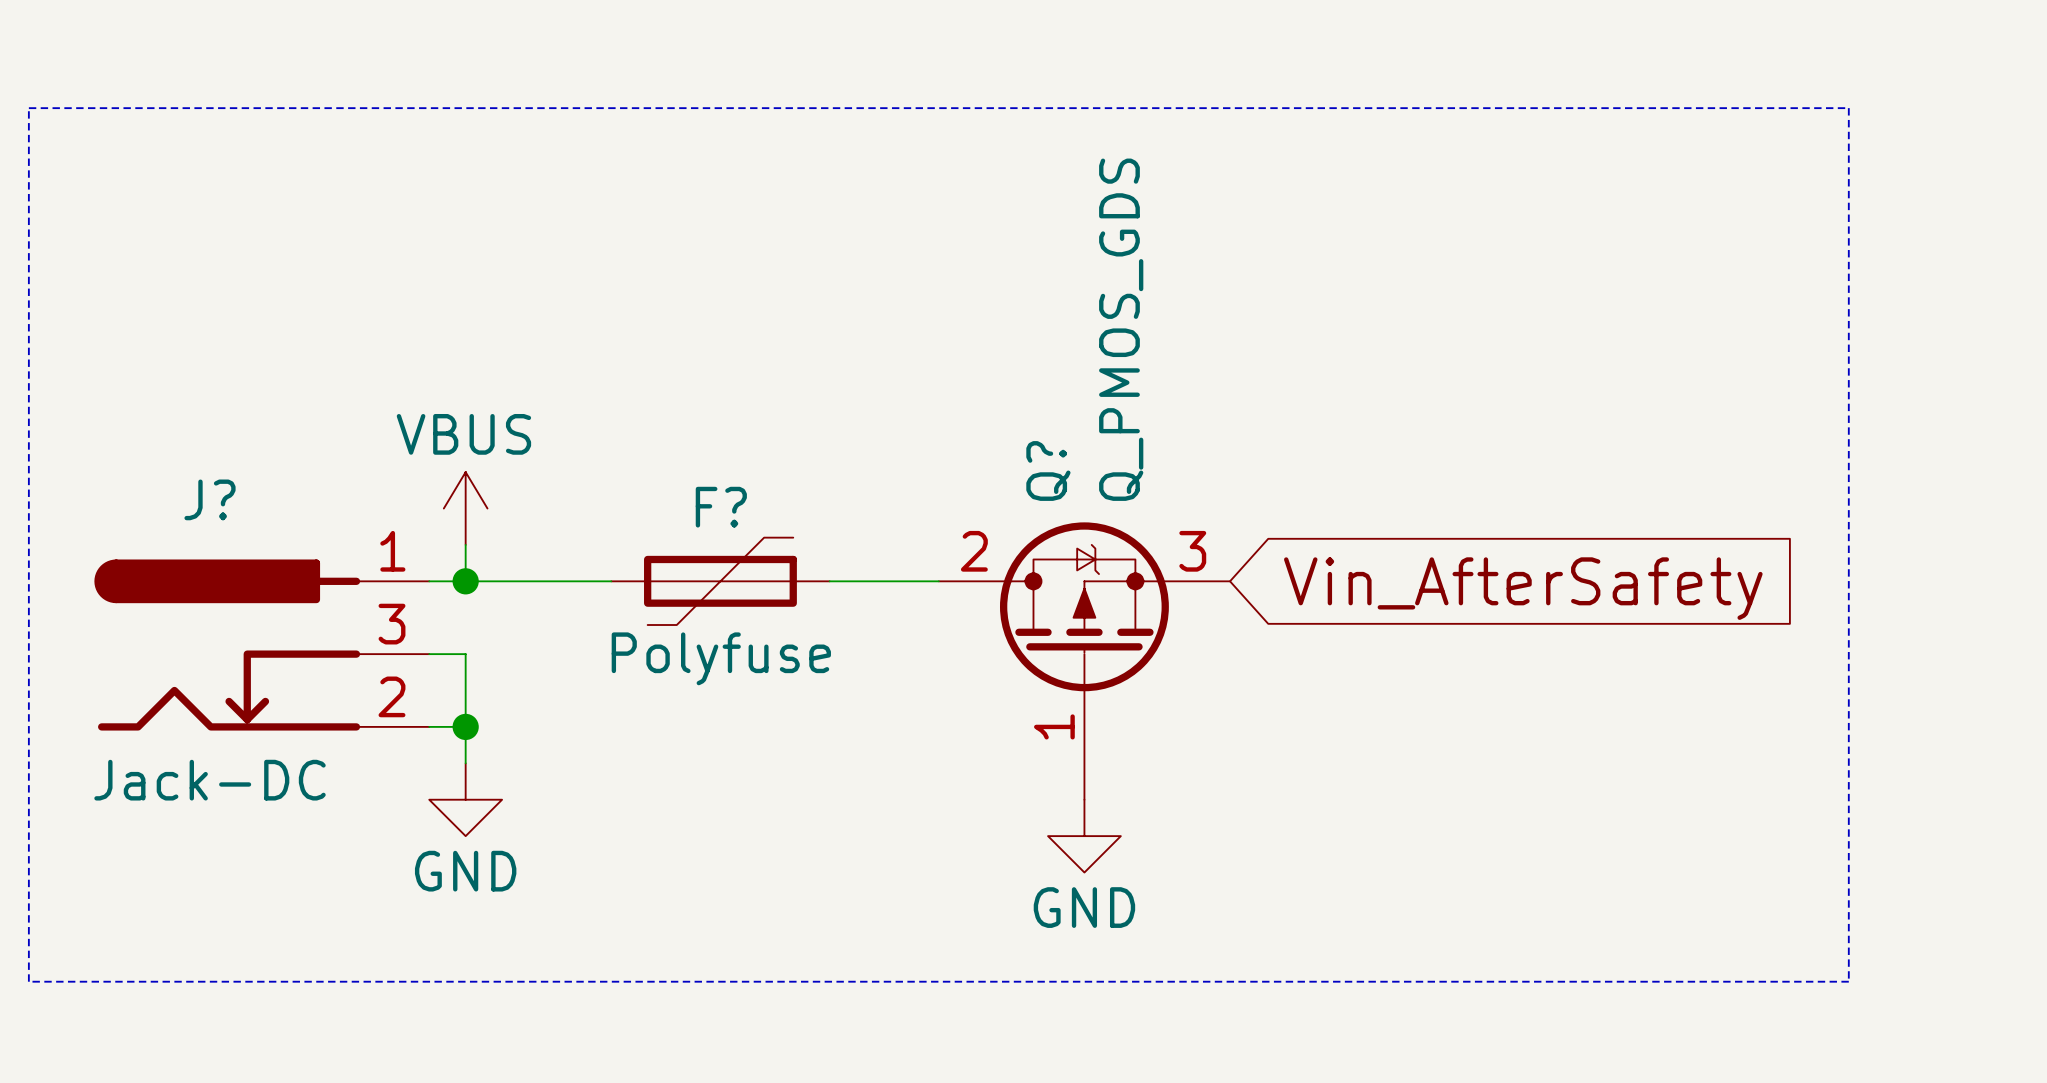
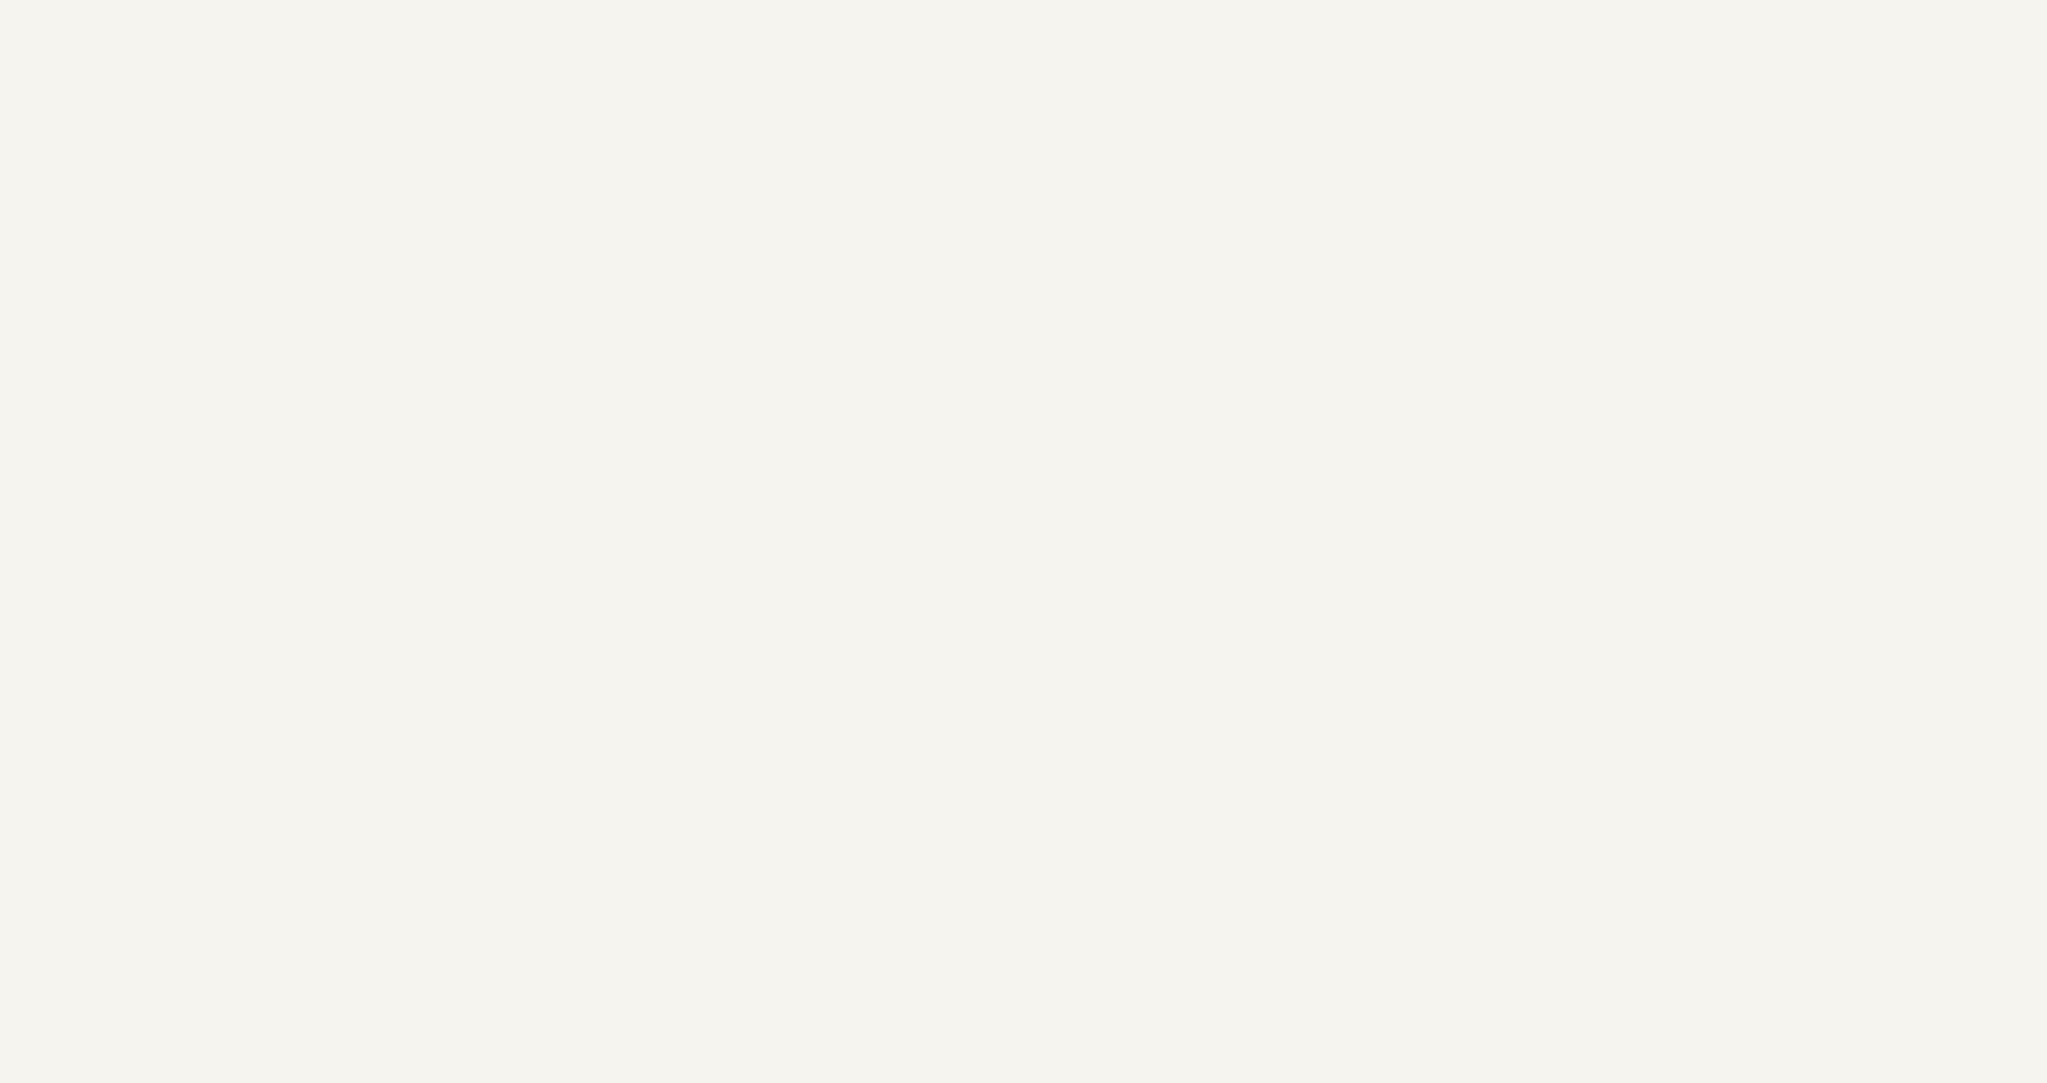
line: (28, 108) (28, 981) (1848, 981) (1848, 108) (28, 108) -> none
power symbol: VBUS (465, 508) -> none
wire: (465, 544) (465, 581) -> none
wire: (429, 581) (611, 581) -> none
junction: (465, 581) -> none
F?: Polyfuse (720, 581) -> none
wire: (829, 581) (938, 581) -> none
global label: Vin_AfterSafety (1523, 588) -> none
J?: Jack-DC (261, 645) -> none
wire: (429, 654) (465, 654) (465, 763) -> none
Q?: Q_PMOS_GDS (1084, 661) -> none
wire: (429, 726) (465, 726) -> none
junction: (465, 726) -> none
power symbol: GND (465, 799) -> none
power symbol: GND (1084, 836) -> none

